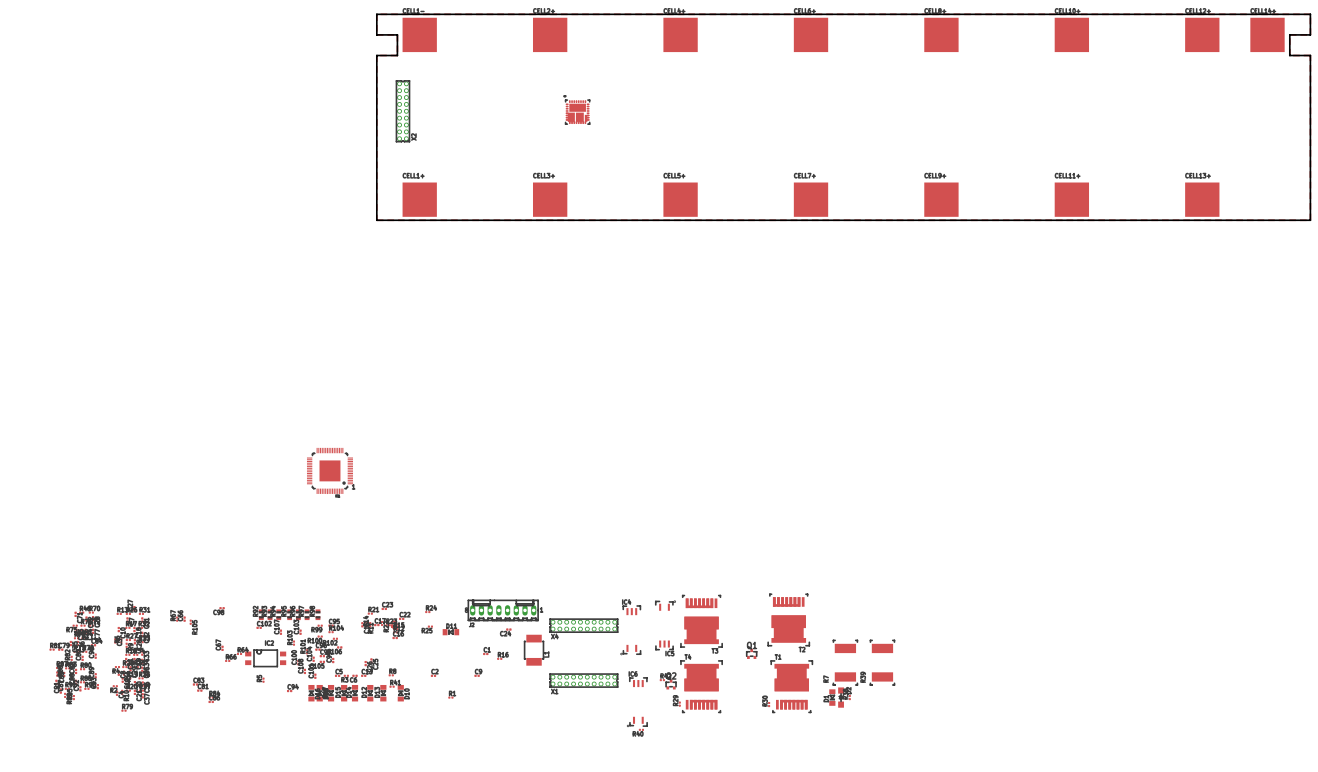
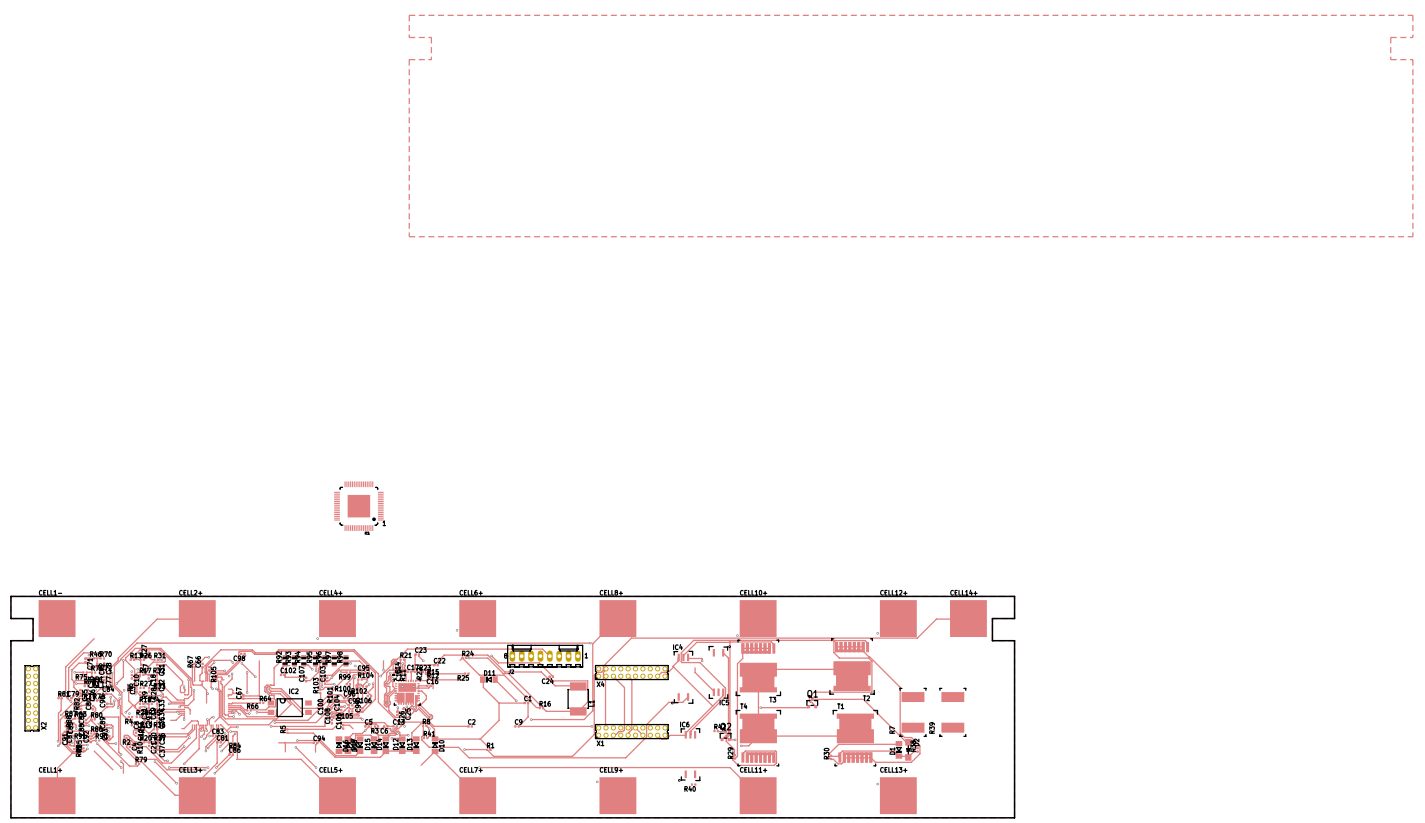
board edge: (376, 14) (1310, 14) (1310, 34) (1289, 34) (1289, 55) (1310, 55) (1310, 220) (376, 220) (376, 55) (397, 55) (397, 34) (376, 34) (376, 14) -> none
part position: (419, 34) -> (57, 618)
part position: (550, 34) -> (197, 618)
part position: (680, 34) -> (337, 618)
part position: (811, 34) -> (477, 618)
part position: (941, 34) -> (617, 618)
part position: (1071, 34) -> (758, 618)
part position: (1202, 34) -> (898, 618)
part position: (1267, 34) -> (968, 618)
part footprint: [562, 99, 590, 125] -> [391, 679, 421, 706]
part position: (402, 111) -> (32, 698)
part position: (419, 199) -> (57, 795)
part position: (550, 199) -> (197, 795)
part position: (680, 199) -> (337, 795)
part position: (811, 199) -> (477, 795)
part position: (941, 199) -> (617, 795)
part position: (1071, 199) -> (758, 795)
part position: (1202, 199) -> (898, 795)
board edge: none -> (10, 596) (1014, 596) (1014, 618) (992, 618) (992, 640) (1014, 640) (1014, 817) (10, 817) (10, 640) (33, 640) (33, 618) (10, 618) (10, 596)
track: none -> (197, 618) (157, 619) (109, 668) (109, 684) (105, 688) (100, 688) (90, 698) (80, 698) (73, 704) (75, 718) (68, 723)
track: none -> (617, 618) (592, 643) (592, 710) (584, 719) (531, 719)
track: none -> (968, 618) (936, 619) (917, 638) (631, 638) (603, 666) (603, 670) (594, 675) (594, 734) (572, 756) (493, 756) (487, 749) (464, 749)
via: none -> (457, 630)
via: none -> (877, 633)
via: none -> (737, 635)
track: none -> (94, 638) (65, 667) (65, 690) (58, 698)
via: none -> (317, 638)
track: none -> (834, 640) (865, 640) (867, 647)
track: none -> (729, 642) (696, 642) (683, 657)
track: none -> (590, 643) (136, 643) (114, 666) (114, 685) (121, 692) (121, 713) (127, 719) (132, 719)
via: none -> (590, 643)
track: none -> (836, 647) (863, 647) (863, 651) (900, 687) (900, 733) (904, 737) (911, 737) (919, 745) (919, 753) (911, 762) (875, 762) (870, 757) (844, 757) (841, 763) (837, 763) (828, 756) (828, 754) (838, 744) (898, 743)
track: none -> (769, 648) (742, 648) (742, 658) (737, 663) (737, 756) (734, 758)
track: none -> (773, 648) (771, 641) (729, 641) (729, 734) (726, 737) (726, 741) (734, 749) (732, 759) (738, 765) (774, 765) (776, 763) (775, 751) (745, 751) (742, 757)
track: none -> (158, 652) (165, 658) (165, 661) (153, 662) (142, 672) (137, 672) (136, 685) (136, 692) (140, 695) (160, 695)
track: none -> (111, 652) (83, 652) (68, 667) (68, 694)
track: none -> (723, 652) (728, 658) (728, 733) (722, 739)
track: none -> (415, 654) (414, 668)
track: none -> (418, 654) (423, 660)
via: none -> (88, 655)
track: none -> (245, 655) (226, 674) (217, 674) (214, 681)
track: none -> (491, 655) (498, 662) (539, 662) (552, 676)
via: none -> (491, 655)
track: none -> (549, 656) (542, 649) (407, 649) (397, 659) (391, 661) (391, 665) (380, 676)
track: none -> (208, 657) (205, 657) (199, 663)
via: none -> (208, 657)
track: none -> (345, 657) (284, 657) (274, 667) (274, 685) (266, 685) (264, 687) (264, 691) (269, 695) (274, 695) (274, 698)
track: none -> (678, 657) (678, 661) (672, 666) (712, 706)
track: none -> (688, 657) (702, 658) (702, 660)
track: none -> (85, 658) (90, 658) (89, 661)
track: none -> (93, 658) (100, 658)
track: none -> (97, 658) (97, 663)
track: none -> (465, 657) (487, 658) (503, 673) (508, 673) (546, 711) (578, 711) (587, 702) (587, 680) (553, 680) (549, 676)
via: none -> (469, 658)
track: none -> (130, 659) (140, 649) (160, 649) (188, 678) (188, 694) (184, 694)
track: none -> (133, 659) (139, 659) (141, 664) (146, 664)
track: none -> (143, 659) (148, 655) (154, 659)
track: none -> (157, 659) (162, 659)
via: none -> (162, 659)
track: none -> (400, 659) (400, 666)
track: none -> (403, 659) (404, 668) (407, 671)
track: none -> (123, 660) (123, 676) (116, 683)
via: none -> (123, 660)
track: none -> (259, 660) (259, 695) (242, 695) (241, 693) (232, 693)
track: none -> (383, 660) (383, 670)
via: none -> (423, 660)
track: none -> (460, 660) (463, 658) (479, 675) (504, 675) (536, 707) (539, 708)
via: none -> (702, 660)
track: none -> (214, 662) (209, 667)
via: none -> (214, 662)
track: none -> (232, 662) (230, 660) (212, 660) (206, 666) (207, 681)
via: none -> (232, 662)
track: none -> (395, 663) (396, 671) (390, 677) (391, 680) (388, 684)
via: none -> (395, 663)
track: none -> (194, 663) (192, 665) (192, 684) (201, 685)
track: none -> (241, 663) (255, 676)
via: none -> (241, 663)
track: none -> (350, 663) (342, 664) (331, 675) (325, 675) (322, 679) (322, 686)
via: none -> (350, 663)
track: none -> (402, 663) (402, 669) (406, 674) (406, 680)
via: none -> (402, 663)
track: none -> (157, 664) (166, 664) (182, 681) (180, 691) (184, 692)
track: none -> (303, 664) (307, 664) (312, 669)
track: none -> (315, 664) (316, 670)
track: none -> (324, 664) (319, 669) (319, 689) (332, 687)
track: none -> (415, 664) (434, 665) (444, 655) (487, 655) (504, 671) (541, 671) (555, 685) (578, 686)
track: none -> (289, 665) (285, 664) (281, 667) (281, 674)
via: none -> (355, 665)
track: none -> (194, 667) (194, 681)
track: none -> (202, 667) (200, 681)
via: none -> (400, 666)
track: none -> (673, 667) (668, 672) (661, 672) (658, 676)
track: none -> (157, 668) (157, 680)
via: none -> (359, 667)
track: none -> (695, 667) (695, 672) (713, 692)
track: none -> (852, 668) (758, 669) (758, 736)
via: none -> (137, 669)
via: none -> (312, 669)
track: none -> (607, 668) (603, 672) (603, 678) (605, 680) (606, 727)
via: none -> (71, 670)
track: none -> (209, 670) (224, 670)
track: none -> (285, 670) (285, 677) (306, 677)
via: none -> (383, 670)
track: none -> (398, 669) (398, 663) (394, 660) (393, 669) (389, 670) (386, 673) (386, 680) (384, 682) (386, 688) (384, 704) (388, 706) (388, 710) (395, 717) (408, 717) (418, 708) (431, 719) (432, 716) (420, 705) (426, 699) (426, 695) (421, 691) (418, 690)
via: none -> (131, 671)
via: none -> (224, 670)
via: none -> (316, 670)
track: none -> (74, 672) (83, 672)
via: none -> (74, 672)
track: none -> (247, 672) (247, 692)
via: none -> (247, 672)
track: none -> (340, 672) (346, 672)
via: none -> (340, 672)
track: none -> (358, 672) (349, 672) (316, 708) (300, 708) (281, 688) (267, 686) (266, 689) (269, 693) (280, 693) (290, 704) (276, 718) (225, 718) (222, 715) (222, 685) (220, 681)
track: none -> (419, 672) (410, 671) (410, 680)
track: none -> (112, 673) (112, 685) (119, 694)
via: none -> (112, 673)
track: none -> (209, 673) (209, 680)
via: none -> (209, 673)
track: none -> (232, 673) (232, 678) (224, 686) (224, 713) (228, 714)
via: none -> (232, 673)
track: none -> (390, 673) (385, 683) (387, 686) (389, 686) (389, 691) (386, 695) (387, 705) (390, 703) (389, 696) (395, 690)
via: none -> (390, 673)
track: none -> (465, 673) (433, 673)
track: none -> (468, 673) (462, 679) (431, 679)
track: none -> (140, 674) (138, 678)
track: none -> (143, 674) (153, 674)
track: none -> (360, 674) (354, 674) (346, 684)
track: none -> (360, 674) (365, 672) (363, 670) (339, 670) (327, 681)
via: none -> (229, 676)
via: none -> (380, 676)
track: none -> (614, 676) (624, 687) (624, 729) (613, 735)
track: none -> (629, 676) (631, 679) (631, 729) (628, 735)
track: none -> (76, 676) (86, 676) (86, 672) (91, 672) (92, 676)
via: none -> (255, 676)
track: none -> (327, 677) (324, 679) (324, 684) (334, 684)
via: none -> (331, 677)
track: none -> (355, 677) (352, 699) (336, 700) (333, 698) (327, 706) (330, 709) (334, 705) (341, 710)
via: none -> (355, 677)
via: none -> (138, 678)
track: none -> (392, 678) (392, 686) (395, 688) (387, 695) (388, 702)
via: none -> (392, 678)
track: none -> (86, 680) (73, 682) (73, 687) (81, 693) (76, 693) (71, 698)
track: none -> (92, 680) (86, 683) (76, 683)
track: none -> (157, 679) (177, 700) (184, 700)
via: none -> (188, 679)
track: none -> (224, 679) (217, 677) (216, 681)
track: none -> (358, 679) (356, 685) (358, 703) (352, 708) (347, 707) (342, 712) (325, 713) (316, 722) (274, 722)
track: none -> (361, 679) (369, 676) (369, 670) (359, 661) (337, 661) (334, 664) (331, 661) (322, 661) (318, 672) (310, 680) (306, 681)
track: none -> (427, 679) (415, 680)
track: none -> (433, 679) (433, 688)
track: none -> (482, 679) (483, 687) (499, 703)
track: none -> (495, 679) (516, 700)
track: none -> (202, 681) (201, 685)
track: none -> (203, 681) (202, 681)
track: none -> (205, 681) (205, 665) (220, 649) (252, 649) (255, 652) (275, 652) (278, 649) (354, 649) (378, 673) (378, 702) (401, 725)
track: none -> (211, 681) (212, 688)
track: none -> (213, 681) (213, 675) (215, 673) (226, 673) (238, 660) (239, 651) (251, 651) (254, 654) (276, 654) (279, 651) (353, 651) (375, 673) (375, 699) (362, 712) (358, 712) (358, 715) (334, 715)
track: none -> (218, 681) (218, 688) (220, 691) (220, 717) (228, 724) (268, 724) (273, 720) (307, 720) (331, 694) (340, 694) (344, 698) (349, 692) (349, 684)
track: none -> (367, 681) (363, 686) (360, 684) (357, 685) (362, 692) (362, 702)
via: none -> (367, 681)
track: none -> (74, 681) (71, 679) (71, 670) (78, 663) (85, 662) (90, 667) (97, 667) (106, 671) (106, 681) (98, 682)
via: none -> (76, 683)
via: none -> (116, 683)
track: none -> (157, 683) (157, 690) (163, 694) (163, 697)
track: none -> (373, 683) (373, 687) (367, 692) (364, 689)
via: none -> (373, 683)
via: none -> (334, 684)
track: none -> (369, 684) (366, 686)
via: none -> (369, 684)
via: none -> (388, 684)
track: none -> (201, 685) (206, 690) (206, 702)
track: none -> (184, 686) (184, 691)
via: none -> (184, 686)
via: none -> (322, 686)
via: none -> (360, 686)
via: none -> (402, 686)
via: none -> (413, 686)
track: none -> (427, 685) (418, 686)
track: none -> (430, 685) (428, 688) (418, 688) (406, 686)
track: none -> (134, 687) (134, 669) (125, 658) (135, 648) (160, 648) (190, 678) (191, 694) (187, 698) (184, 698)
via: none -> (332, 687)
via: none -> (212, 688)
track: none -> (216, 688) (219, 691) (219, 717) (214, 721)
via: none -> (216, 688)
track: none -> (268, 688) (271, 691) (281, 691) (303, 714)
via: none -> (268, 688)
track: none -> (81, 689) (82, 694) (61, 715)
via: none -> (95, 689)
track: none -> (228, 689) (231, 689) (232, 693)
via: none -> (124, 690)
track: none -> (128, 690) (128, 700) (139, 711) (148, 711)
track: none -> (193, 690) (193, 699) (187, 705) (179, 706)
via: none -> (193, 690)
via: none -> (247, 692)
track: none -> (320, 692) (320, 700)
track: none -> (367, 692) (371, 695)
track: none -> (723, 692) (723, 695) (685, 733) (685, 735) (670, 735) (666, 739) (661, 739) (657, 735)
via: none -> (135, 694)
via: none -> (207, 693)
track: none -> (232, 693) (228, 696)
via: none -> (119, 694)
track: none -> (65, 695) (70, 701)
via: none -> (160, 695)
track: none -> (110, 697) (110, 703)
via: none -> (110, 697)
track: none -> (163, 697) (157, 700)
track: none -> (163, 697) (166, 697) (171, 702) (184, 702)
track: none -> (688, 696) (682, 702) (668, 702) (646, 724) (646, 736) (625, 757) (469, 757) (458, 747) (429, 747) (421, 739) (423, 725)
track: none -> (61, 698) (61, 710) (58, 713) (57, 741)
track: none -> (119, 698) (120, 744) (135, 759)
via: none -> (119, 698)
track: none -> (142, 698) (135, 707)
track: none -> (228, 698) (274, 698)
track: none -> (274, 698) (274, 706) (268, 706) (265, 709) (250, 710)
track: none -> (812, 699) (863, 699) (906, 742) (913, 748) (917, 748)
track: none -> (84, 700) (78, 706)
track: none -> (90, 700) (90, 707) (92, 709)
track: none -> (96, 700) (106, 693) (111, 694) (118, 700) (118, 707)
track: none -> (114, 700) (112, 706) (106, 706) (94, 719)
via: none -> (114, 700)
via: none -> (320, 700)
track: none -> (368, 700) (362, 708) (357, 707) (357, 714) (331, 714) (333, 718) (362, 719)
via: none -> (516, 700)
via: none -> (70, 701)
track: none -> (259, 702) (228, 703)
via: none -> (388, 702)
track: none -> (524, 702) (499, 703)
track: none -> (528, 702) (528, 717) (518, 726) (592, 726)
track: none -> (107, 703) (112, 703)
via: none -> (112, 703)
track: none -> (143, 703) (148, 703) (148, 708)
track: none -> (157, 703) (157, 709) (184, 709)
track: none -> (169, 703) (184, 703)
via: none -> (169, 703)
track: none -> (499, 703) (499, 720) (480, 739)
track: none -> (132, 705) (125, 712)
track: none -> (88, 705) (81, 706)
track: none -> (92, 706) (95, 710) (85, 720)
track: none -> (228, 705) (240, 705) (247, 710)
track: none -> (349, 705) (345, 702) (334, 702) (329, 707)
track: none -> (76, 706) (81, 709)
track: none -> (139, 706) (145, 706)
via: none -> (145, 706)
via: none -> (179, 706)
track: none -> (344, 706) (341, 706)
via: none -> (344, 706)
via: none -> (406, 706)
track: none -> (808, 706) (760, 707)
track: none -> (815, 706) (809, 701) (809, 697) (814, 692) (871, 692) (871, 661) (868, 658) (839, 658) (833, 652) (835, 640) (693, 640) (681, 652) (681, 661) (699, 662) (725, 688) (725, 696) (690, 730) (690, 734)
via: none -> (118, 707)
track: none -> (184, 707) (190, 709) (190, 714)
track: none -> (228, 707) (240, 707) (246, 713) (249, 713)
via: none -> (329, 707)
track: none -> (397, 707) (397, 711)
via: none -> (397, 707)
track: none -> (403, 707) (405, 709) (411, 705) (414, 707)
via: none -> (414, 707)
via: none -> (760, 707)
track: none -> (228, 709) (229, 709)
track: none -> (229, 709) (239, 709) (247, 716) (274, 716) (276, 709)
track: none -> (184, 711) (157, 712) (157, 717)
track: none -> (228, 711) (236, 710) (239, 714)
via: none -> (125, 712)
track: none -> (256, 712) (271, 712)
via: none -> (256, 712)
via: none -> (129, 713)
via: none -> (178, 713)
track: none -> (184, 713) (178, 713)
track: none -> (234, 713) (228, 713)
via: none -> (234, 713)
via: none -> (249, 713)
via: none -> (239, 714)
via: none -> (61, 715)
track: none -> (184, 714) (181, 715) (175, 720) (170, 720)
via: none -> (334, 715)
track: none -> (397, 714) (400, 712) (407, 712) (411, 708) (415, 709) (415, 703) (430, 717)
track: none -> (184, 716) (184, 719)
track: none -> (233, 716) (228, 716)
via: none -> (233, 716)
track: none -> (332, 716) (324, 719) (324, 726) (271, 726)
track: none -> (68, 717) (64, 715) (60, 719) (60, 743) (58, 745)
track: none -> (99, 717) (118, 717) (118, 752) (121, 754)
track: none -> (213, 717) (209, 719) (209, 724)
via: none -> (213, 717)
via: none -> (430, 717)
track: none -> (78, 718) (84, 725) (88, 725)
via: none -> (184, 719)
track: none -> (207, 719) (207, 724)
via: none -> (207, 719)
via: none -> (328, 719)
via: none -> (362, 719)
via: none -> (371, 719)
via: none -> (531, 719)
track: none -> (149, 720) (140, 729) (133, 731) (135, 736) (140, 736) (146, 739)
track: none -> (157, 721) (157, 733) (187, 733) (192, 729) (192, 724)
track: none -> (73, 723) (76, 725) (76, 728)
track: none -> (85, 723) (91, 719) (103, 733) (103, 740) (129, 766) (137, 766) (139, 763)
track: none -> (97, 723) (108, 731)
via: none -> (274, 722)
track: none -> (371, 724) (371, 728) (378, 735)
via: none -> (88, 725)
track: none -> (103, 724) (112, 726) (112, 736) (109, 739)
track: none -> (194, 724) (194, 729) (186, 736) (157, 736) (157, 746)
track: none -> (196, 724) (196, 738) (171, 763) (162, 763) (145, 746) (135, 745)
track: none -> (198, 724) (197, 720) (191, 720) (181, 728)
track: none -> (200, 724) (199, 748) (184, 763)
track: none -> (201, 724) (201, 730)
track: none -> (203, 724) (204, 733) (201, 736)
track: none -> (205, 724) (206, 730)
track: none -> (211, 724) (211, 730) (204, 739)
track: none -> (213, 724) (213, 735)
track: none -> (216, 724) (216, 730)
track: none -> (218, 724) (218, 737) (208, 748)
track: none -> (220, 724) (228, 732) (228, 744) (221, 751)
track: none -> (343, 725) (349, 725) (353, 728)
track: none -> (65, 726) (67, 733) (64, 735)
via: none -> (271, 726)
track: none -> (365, 726) (370, 724) (376, 724) (378, 726)
track: none -> (368, 726) (362, 733) (353, 733) (347, 738)
track: none -> (374, 726) (376, 728) (384, 726) (385, 728) (390, 728) (391, 731) (405, 722) (429, 722) (433, 726) (468, 726)
track: none -> (388, 726) (393, 726)
track: none -> (388, 726) (384, 722) (339, 722) (332, 729) (283, 729)
track: none -> (396, 726) (392, 729)
via: none -> (404, 726)
track: none -> (426, 725) (429, 728) (429, 736) (427, 738)
via: none -> (592, 726)
track: none -> (237, 727) (230, 727) (226, 730)
via: none -> (237, 727)
via: none -> (76, 728)
track: none -> (110, 727) (107, 728)
via: none -> (110, 727)
via: none -> (429, 728)
track: none -> (635, 727) (642, 735)
track: none -> (144, 729) (148, 733) (154, 729)
via: none -> (392, 729)
track: none -> (95, 730) (97, 734) (90, 738)
track: none -> (95, 730) (85, 731)
via: none -> (201, 730)
via: none -> (206, 730)
via: none -> (365, 730)
track: none -> (64, 731) (62, 733) (62, 743) (72, 753)
track: none -> (67, 731) (85, 731)
via: none -> (108, 731)
track: none -> (230, 731) (237, 732) (237, 759)
via: none -> (230, 731)
track: none -> (717, 731) (725, 732)
track: none -> (287, 732) (313, 733) (335, 755) (355, 755) (360, 751)
track: none -> (94, 733) (87, 738)
track: none -> (225, 733) (225, 737) (220, 742)
via: none -> (225, 733)
track: none -> (235, 733) (232, 736) (232, 749)
via: none -> (235, 733)
track: none -> (397, 733) (390, 735) (383, 741) (383, 745)
via: none -> (397, 733)
track: none -> (85, 735) (71, 735) (67, 739) (67, 745) (73, 751) (78, 751) (83, 748)
track: none -> (106, 734) (109, 736) (106, 738) (109, 743) (115, 743)
via: none -> (209, 736)
track: none -> (215, 735) (205, 746) (205, 751)
track: none -> (220, 735) (217, 742) (217, 763) (197, 782) (197, 795) (175, 795) (141, 761) (135, 763)
track: none -> (408, 735) (399, 735) (398, 731) (387, 735) (378, 735) (378, 741) (374, 745) (374, 751)
via: none -> (408, 735)
track: none -> (758, 736) (855, 736)
track: none -> (758, 736) (748, 745) (741, 745)
via: none -> (201, 736)
track: none -> (73, 737) (74, 745) (69, 744)
via: none -> (73, 737)
via: none -> (87, 738)
track: none -> (126, 737) (133, 742) (133, 747) (137, 751)
track: none -> (189, 737) (177, 749) (157, 749)
via: none -> (189, 737)
track: none -> (391, 738) (402, 738)
via: none -> (391, 738)
via: none -> (204, 739)
track: none -> (374, 738) (370, 735) (355, 735) (355, 738) (351, 742) (338, 751)
track: none -> (480, 739) (435, 739) (434, 729) (428, 723) (421, 723) (411, 732) (411, 751)
track: none -> (480, 739) (490, 749)
track: none -> (729, 739) (735, 739)
track: none -> (78, 740) (90, 742) (95, 740)
track: none -> (226, 740) (220, 746)
track: none -> (297, 740) (318, 740) (335, 757) (380, 757) (385, 751) (416, 751)
via: none -> (297, 740)
via: none -> (735, 739)
via: none -> (57, 741)
track: none -> (140, 742) (135, 742) (127, 735) (124, 736) (124, 739) (129, 743) (126, 747) (138, 759) (156, 759) (166, 769) (205, 769)
track: none -> (143, 742) (154, 742)
via: none -> (72, 742)
track: none -> (97, 743) (121, 767)
via: none -> (97, 743)
via: none -> (115, 743)
track: none -> (278, 742) (313, 742)
track: none -> (285, 742) (285, 751)
track: none -> (317, 742) (315, 752)
via: none -> (58, 745)
track: none -> (87, 745) (74, 749)
via: none -> (87, 745)
via: none -> (741, 745)
track: none -> (184, 746) (178, 751) (160, 751)
via: none -> (184, 746)
via: none -> (220, 746)
track: none -> (154, 747) (154, 750) (164, 760) (167, 760)
via: none -> (208, 748)
track: none -> (295, 747) (316, 767)
via: none -> (295, 747)
track: none -> (87, 748) (79, 753) (72, 753)
via: none -> (87, 748)
track: none -> (229, 749) (229, 754) (216, 767)
via: none -> (464, 749)
track: none -> (94, 751) (112, 769)
via: none -> (205, 751)
via: none -> (221, 751)
track: none -> (917, 751) (913, 751) (908, 757) (898, 756) (894, 751) (842, 751) (838, 756)
track: none -> (72, 753) (57, 768) (57, 795)
via: none -> (121, 754)
track: none -> (232, 754) (214, 773)
track: none -> (831, 755) (838, 756)
track: none -> (236, 759) (301, 759) (337, 795)
via: none -> (167, 760)
track: none -> (121, 761) (123, 763) (123, 773)
via: none -> (121, 761)
track: none -> (154, 761) (176, 783)
via: none -> (154, 761)
via: none -> (184, 763)
track: none -> (421, 765) (435, 751) (477, 795)
via: none -> (121, 767)
track: none -> (169, 767) (208, 767)
via: none -> (169, 767)
via: none -> (208, 767)
via: none -> (216, 767)
via: none -> (316, 767)
track: none -> (479, 767) (729, 767) (758, 795)
via: none -> (479, 767)
via: none -> (205, 769)
via: none -> (214, 773)
via: none -> (597, 781)
via: none -> (176, 783)
via: none -> (877, 784)

